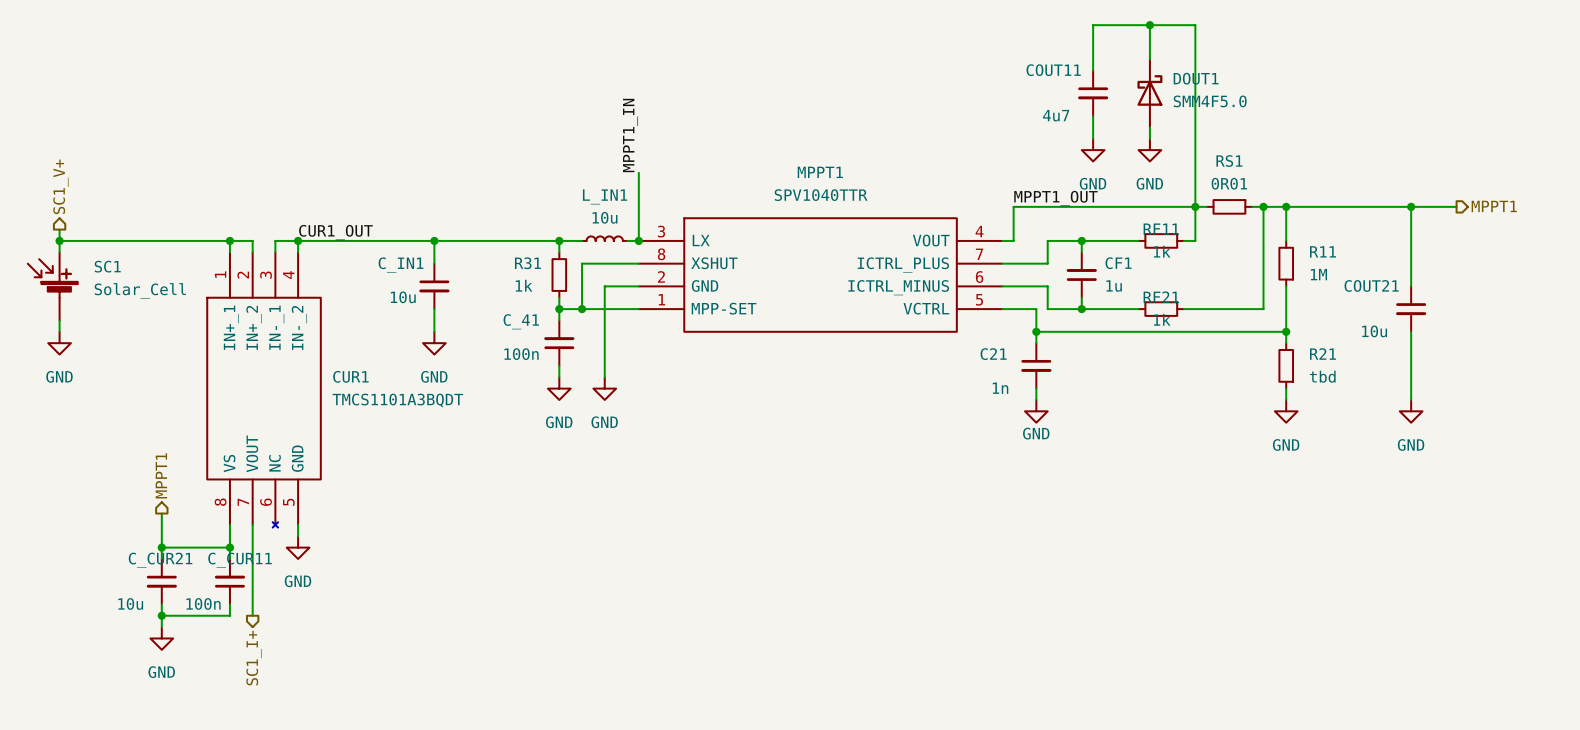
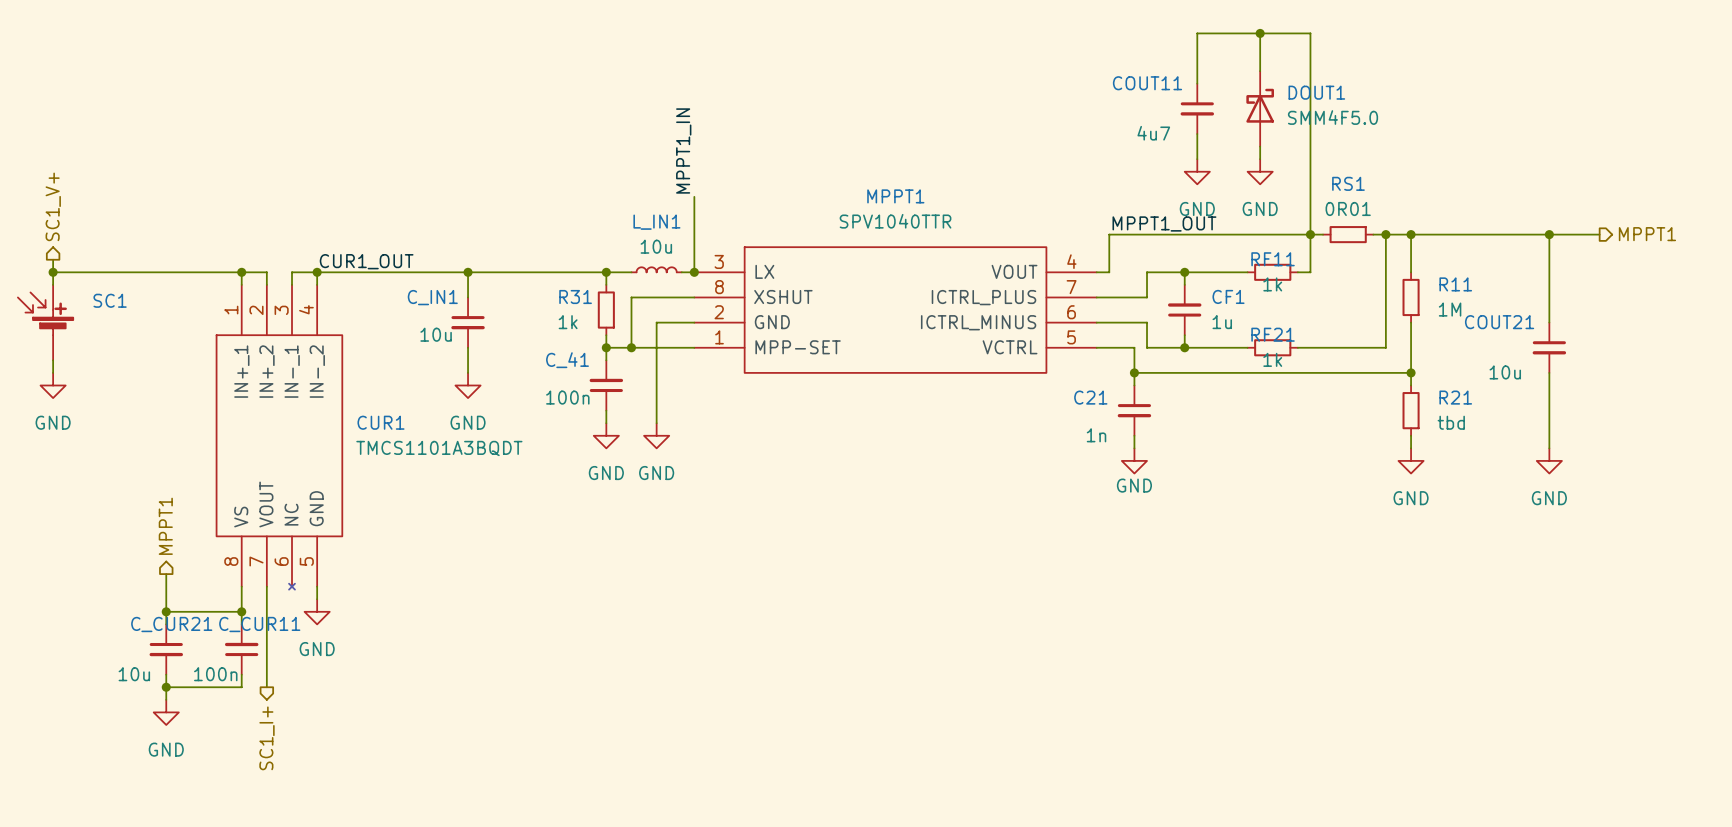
SC1 value: Solar_Cell (140, 290) -> none

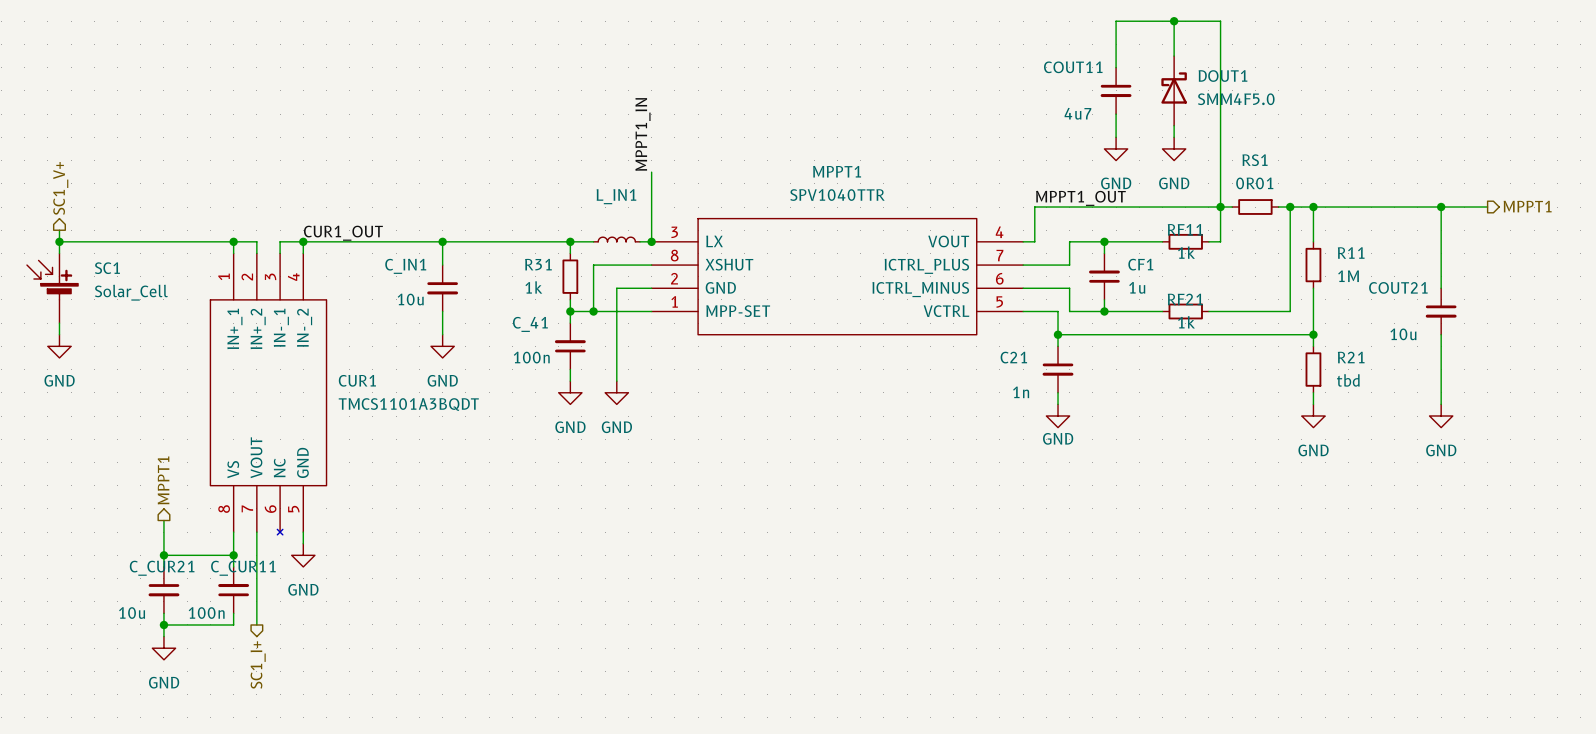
L_IN1 value: 10u (656, 246) -> none
SC1 value: none -> Solar_Cell (131, 292)

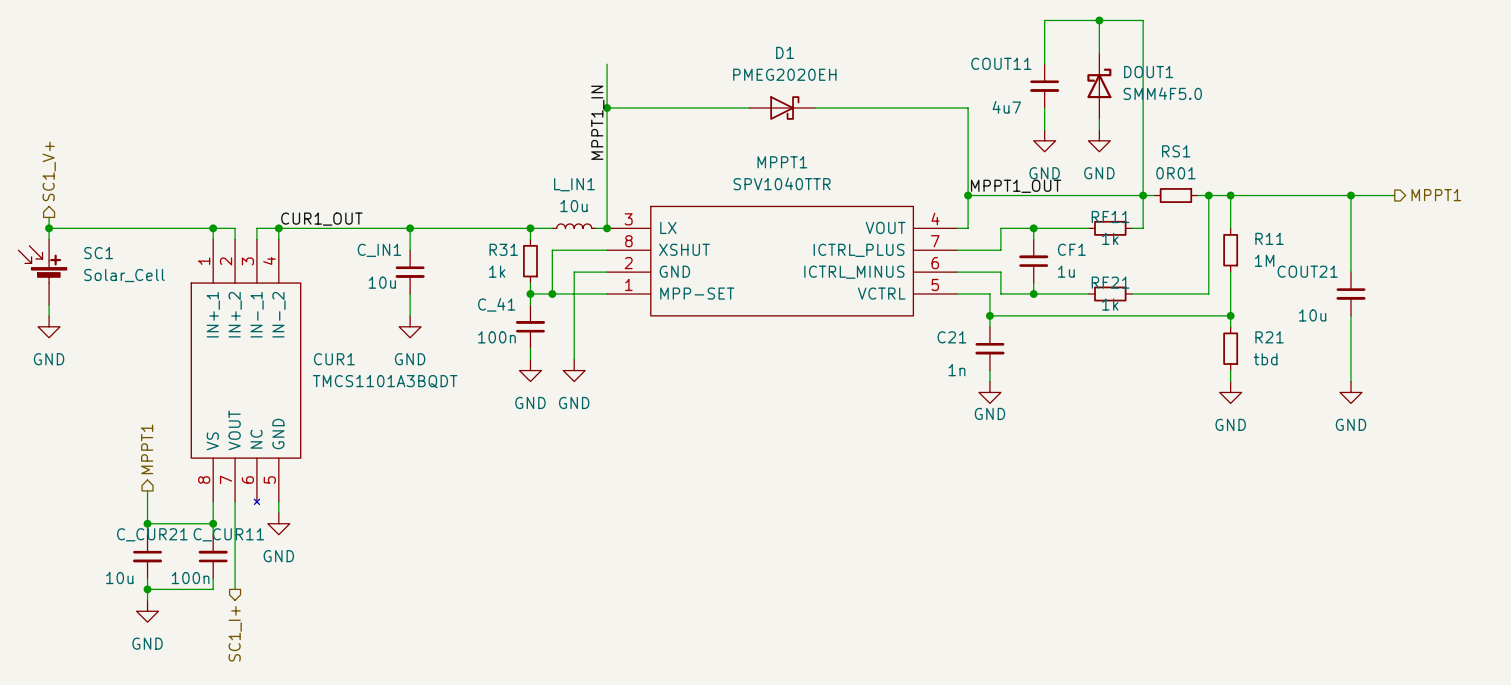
wire: none -> (607, 64) (607, 162)
wire: none -> (607, 108) (749, 108)
junction: none -> (607, 108)
D1: none -> PMEG2020EH (782, 108)
wire: none -> (814, 108) (968, 108) (968, 195)
junction: none -> (968, 195)
L_IN1 value: none -> 10u (573, 206)

